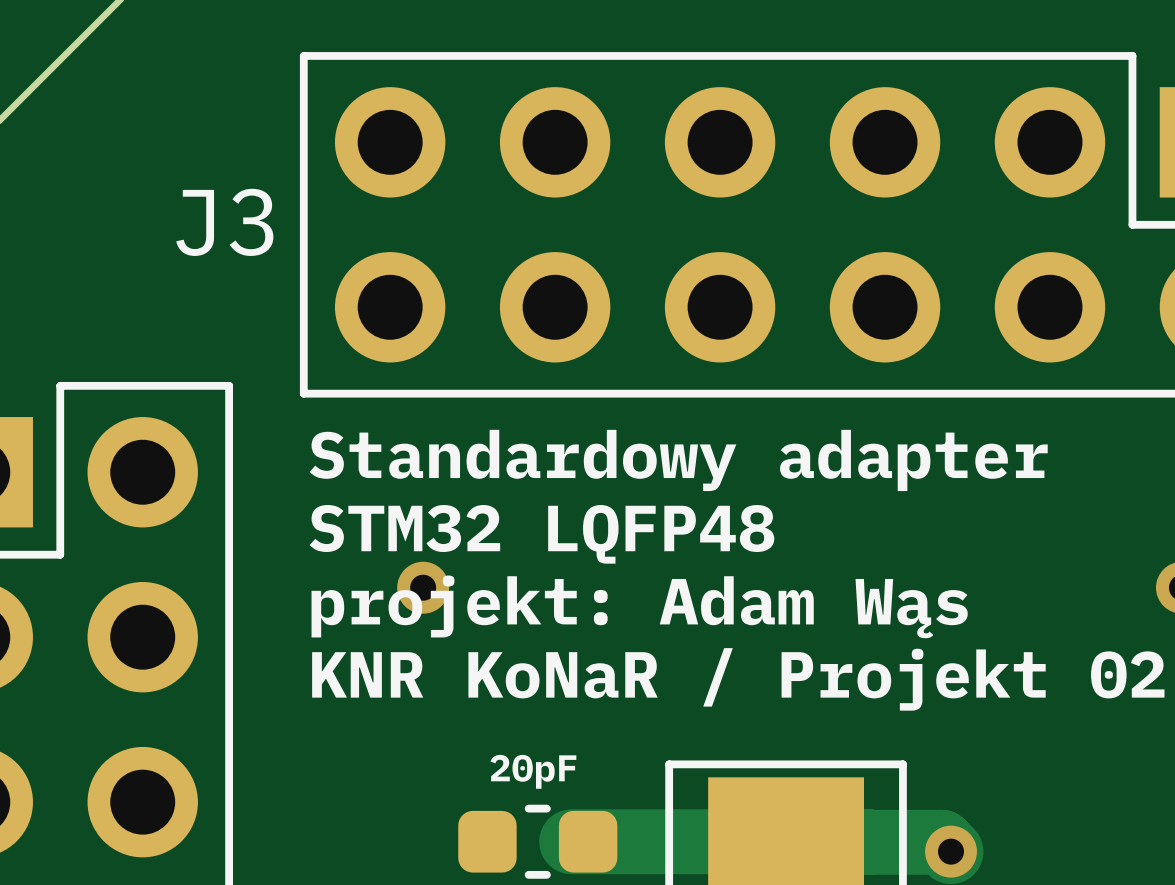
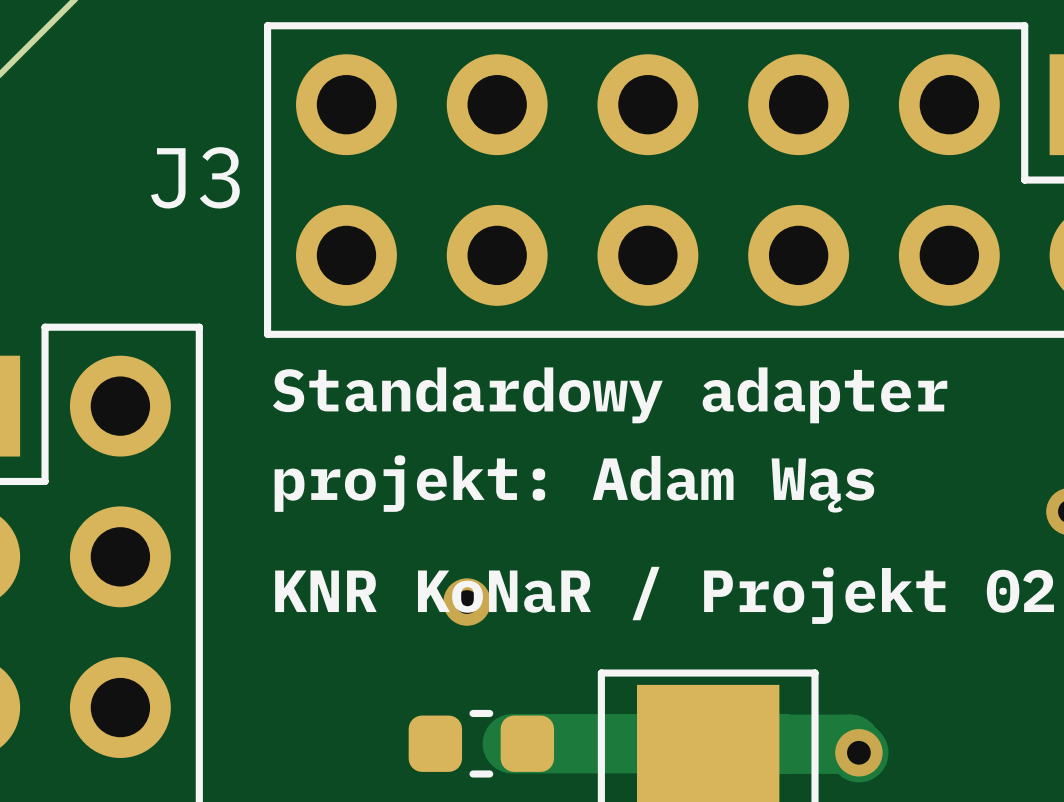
text: STM32 LQFP48 (542, 534) -> none
via position: (423, 587) -> (467, 602)
text position: projekt: Adam Wąs (639, 606) -> projekt: Adam Wąs (574, 483)
text: 20pF (533, 771) -> none

